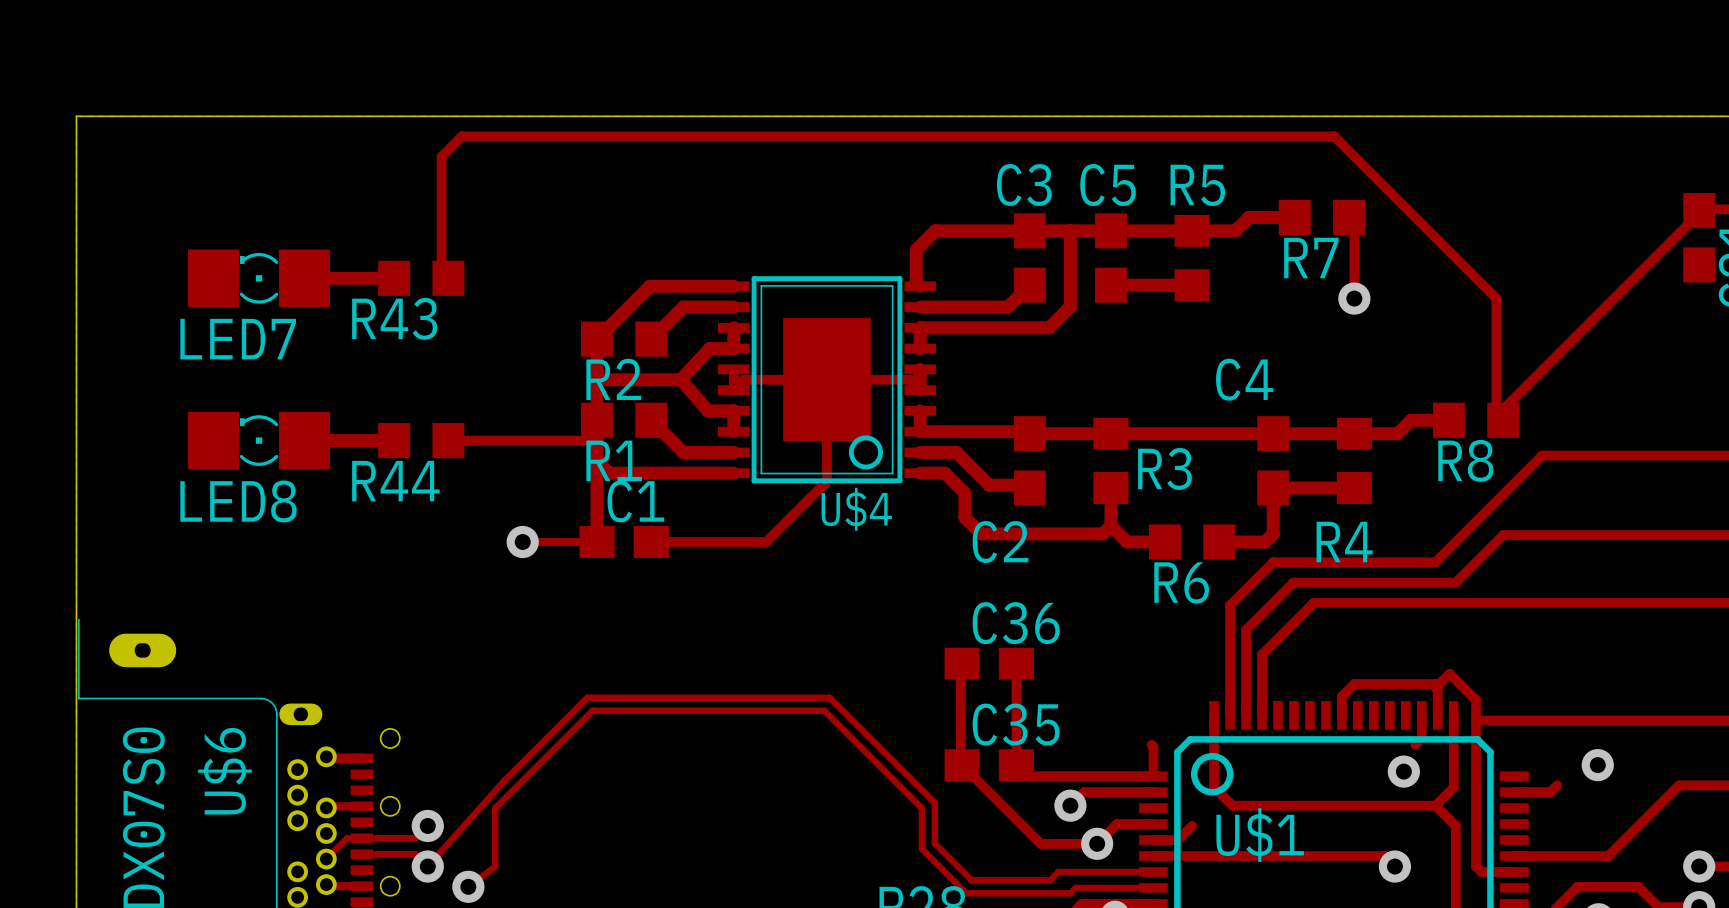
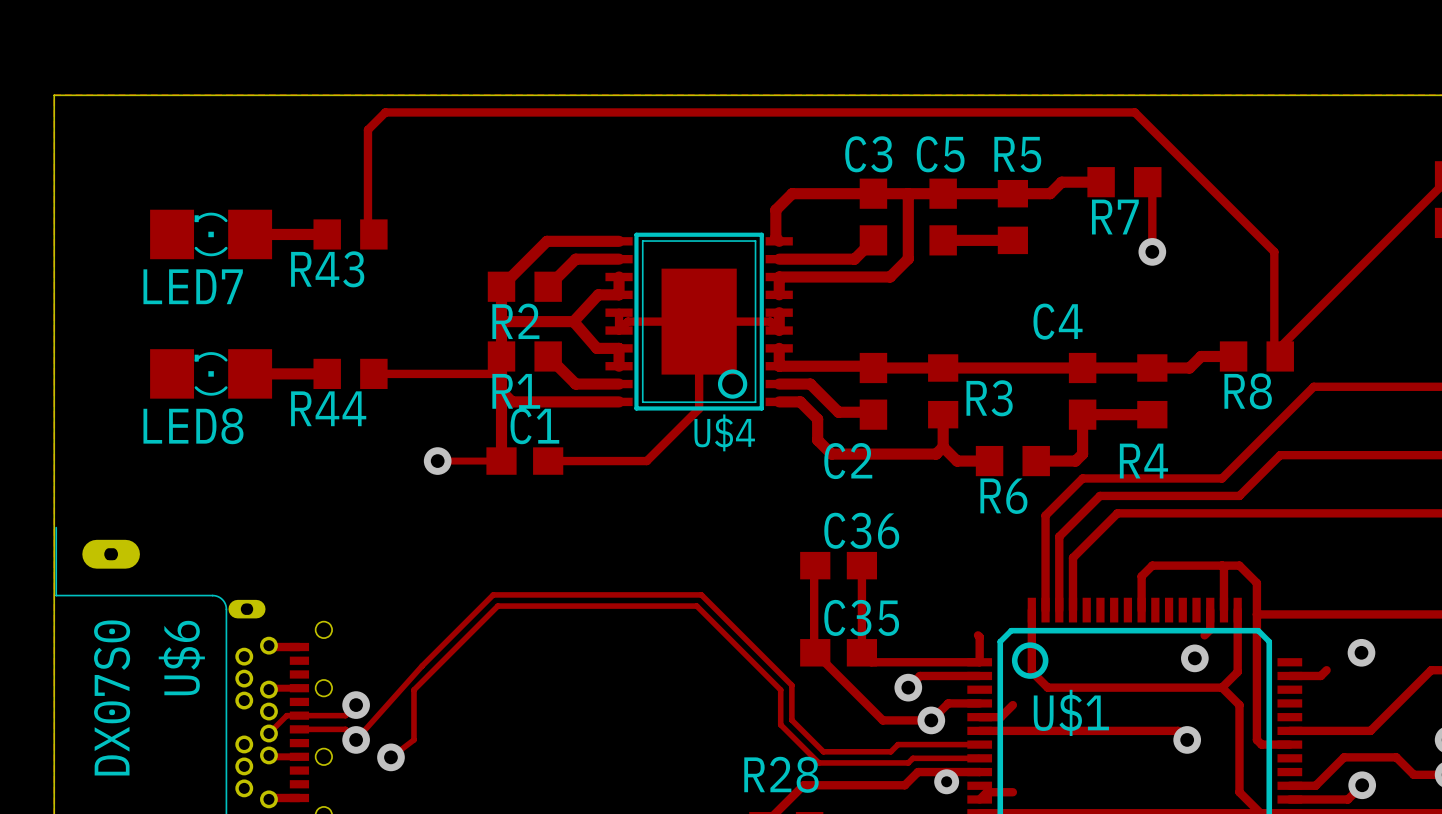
track: none -> (1222, 565) (1223, 567) (1223, 584)
track: (1437, 685) (1435, 683) (1354, 683) (1341, 696) -> (1256, 597) (1256, 583) (1239, 565) (1152, 565) (1141, 576) (1141, 593)
track: (1435, 688) (1449, 673) (1476, 700) -> none

